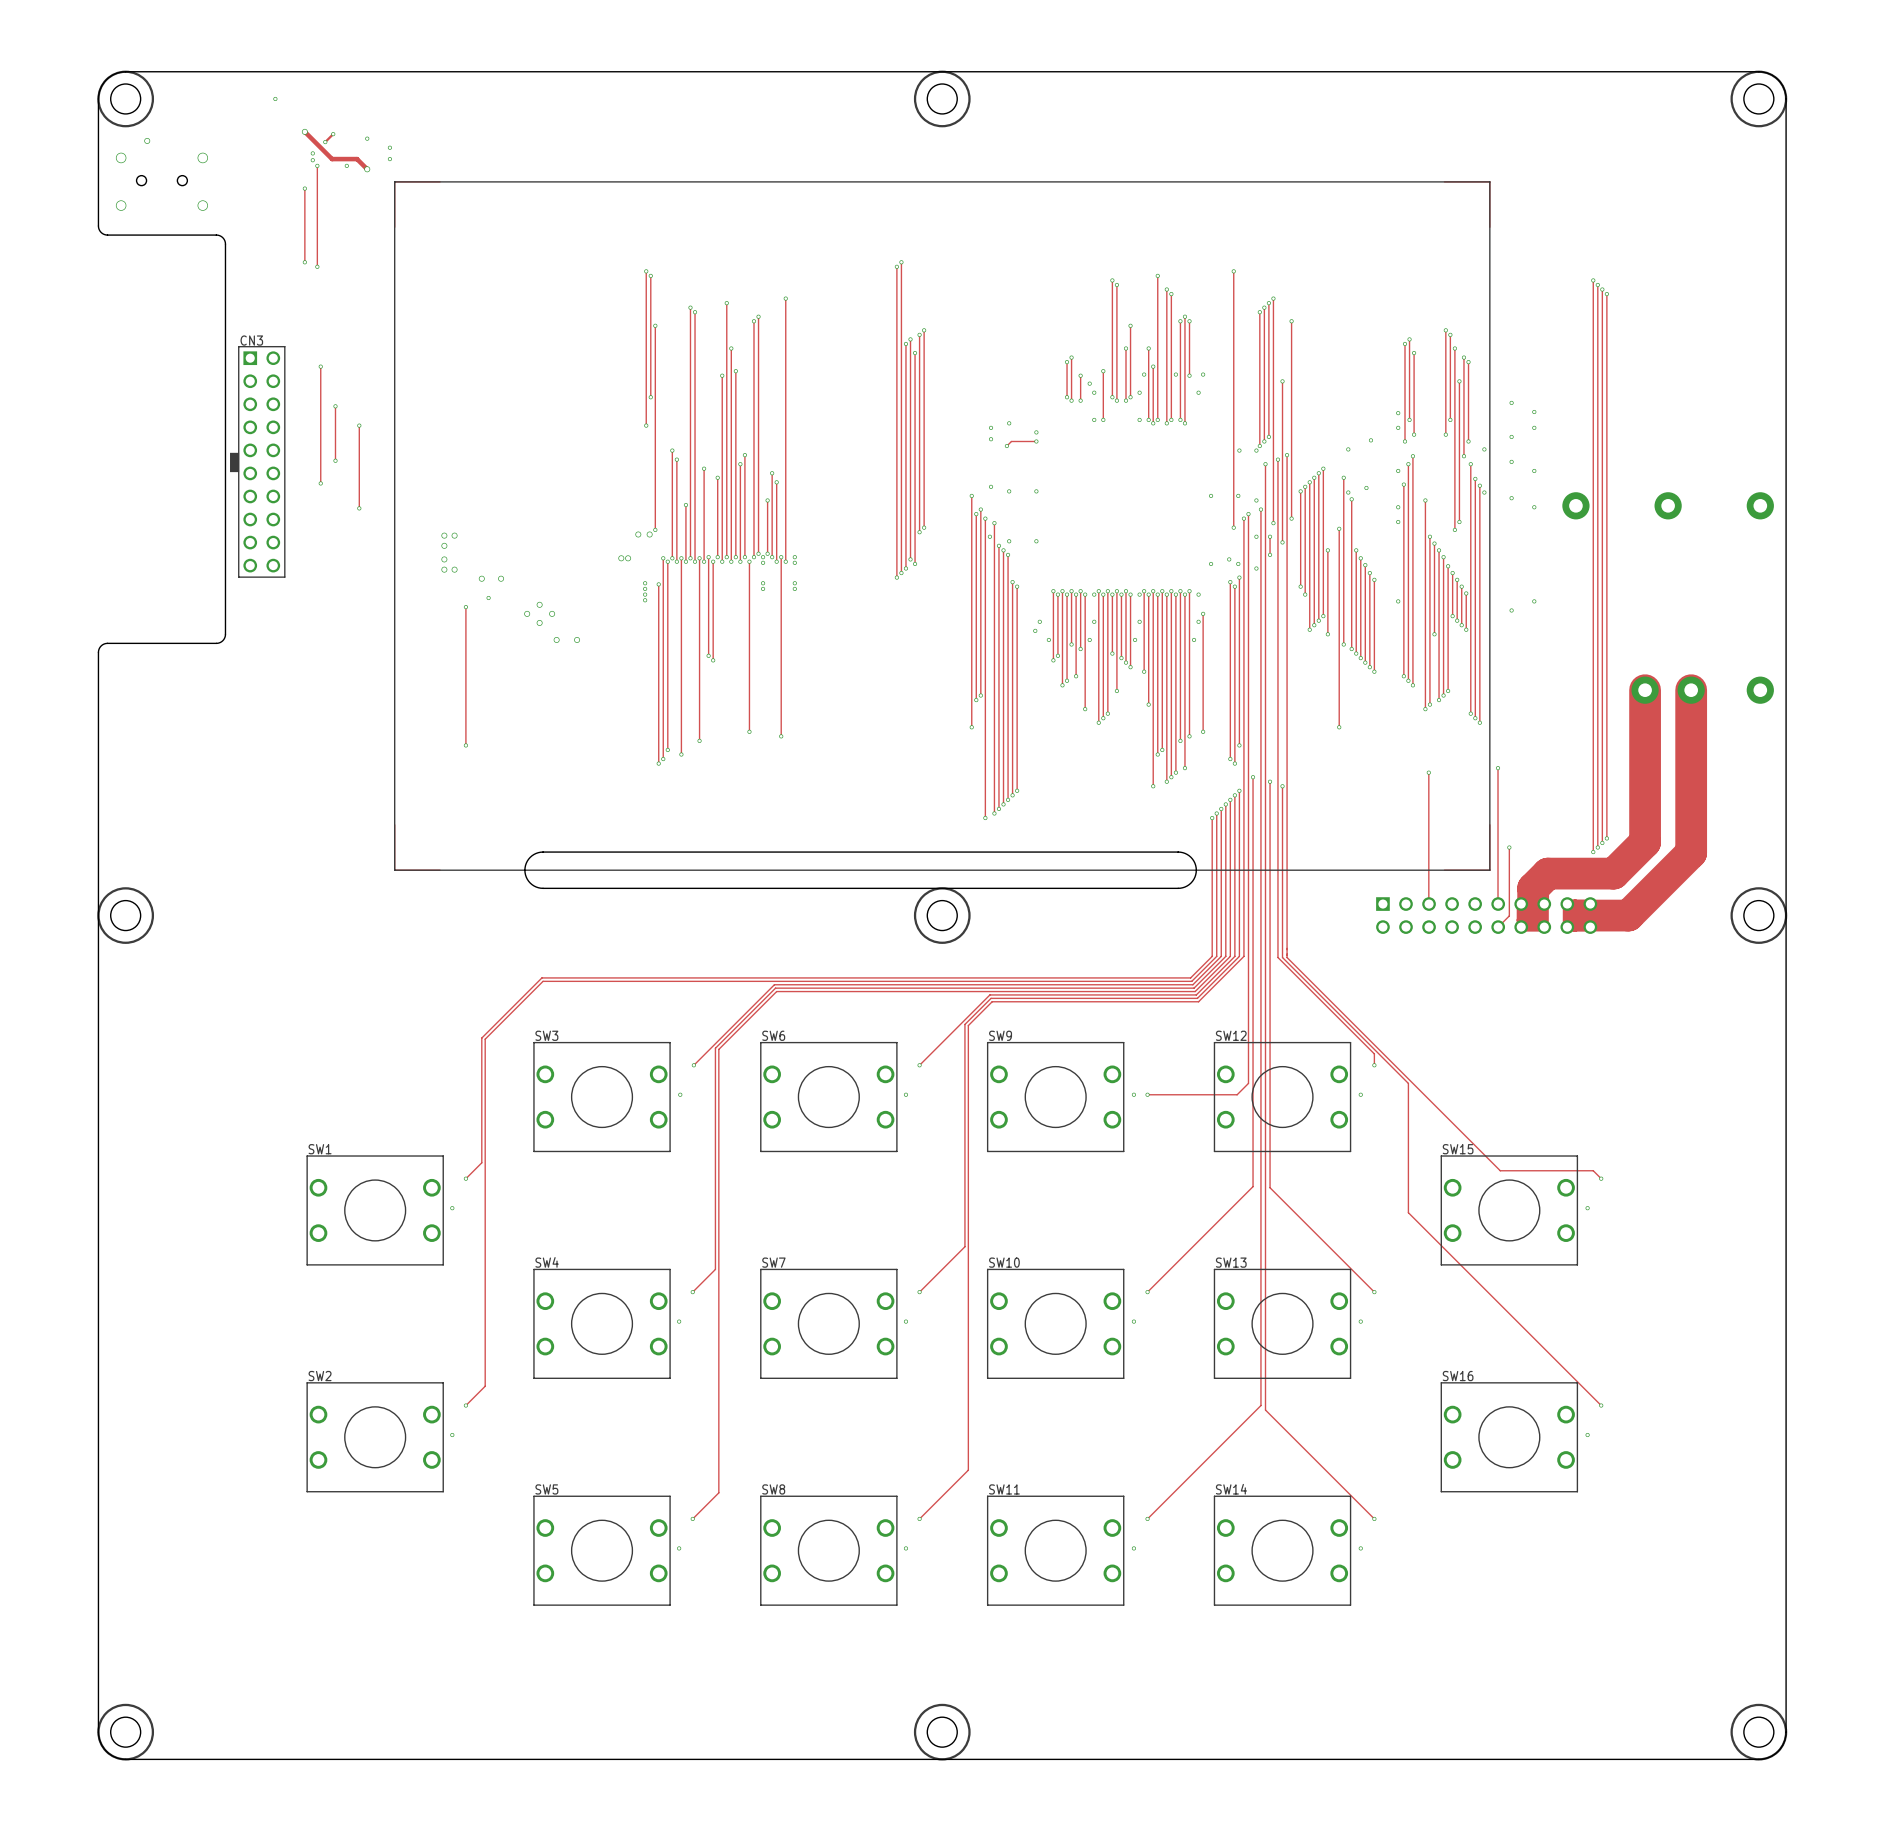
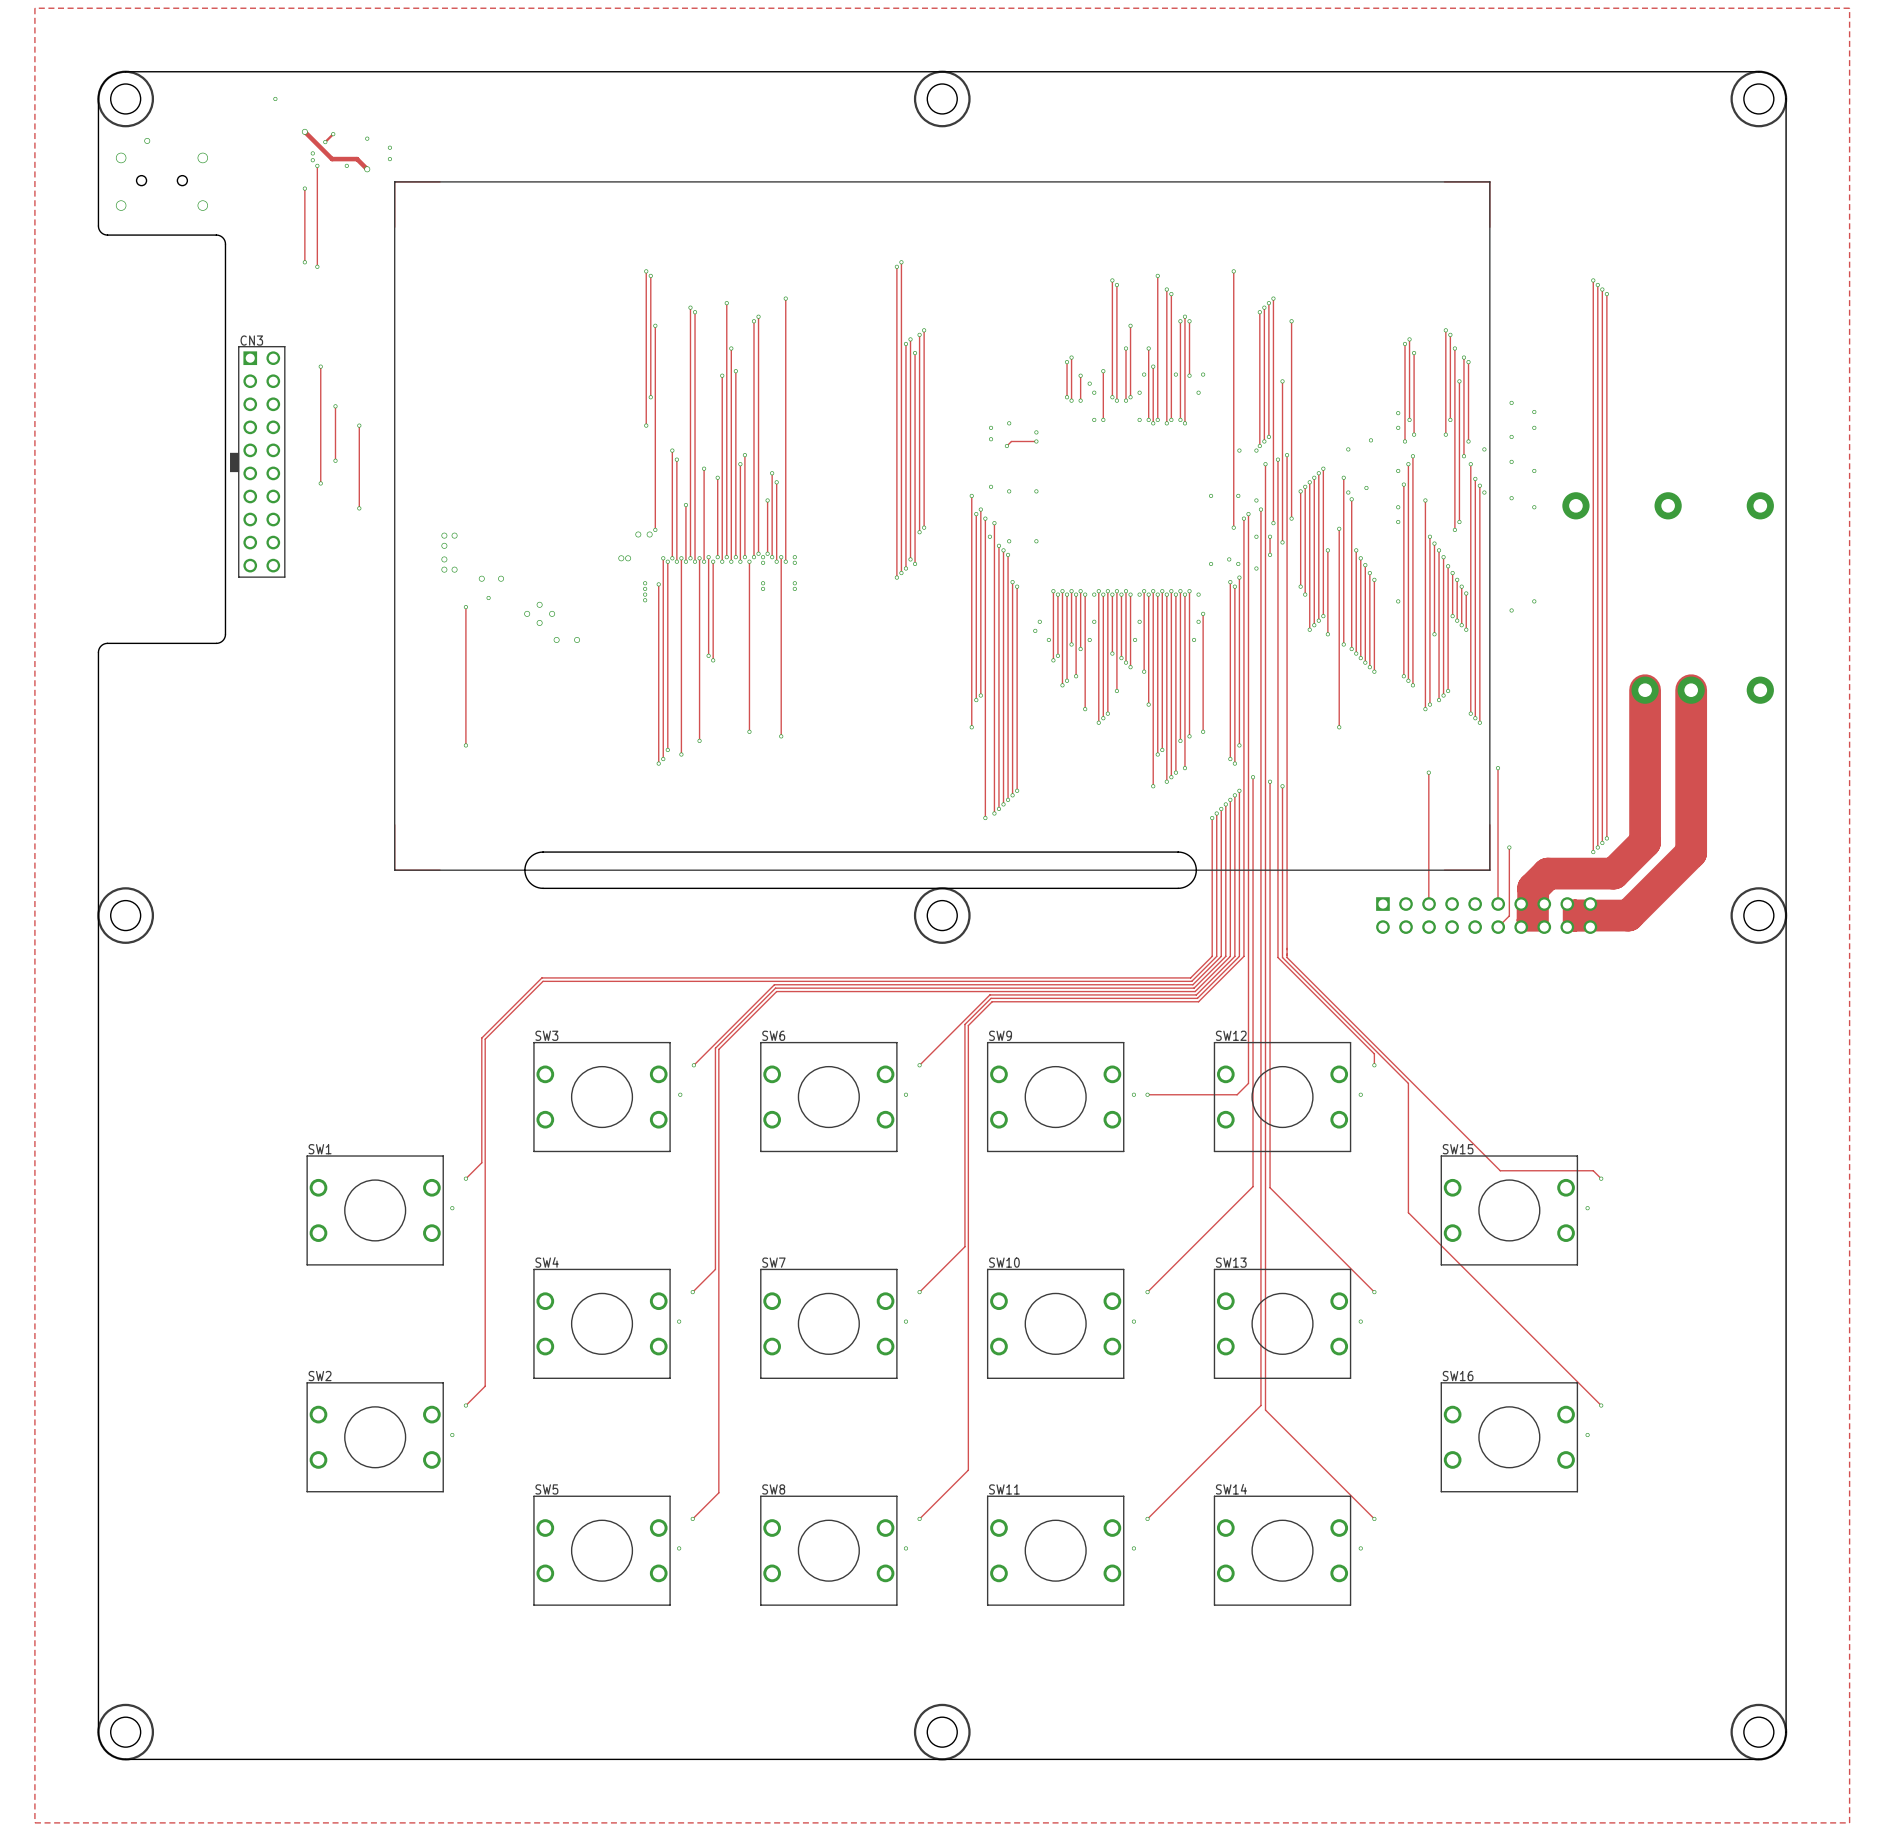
zone outline: none -> (34, 8) (1849, 8) (1849, 1822) (34, 1822) (34, 8)

